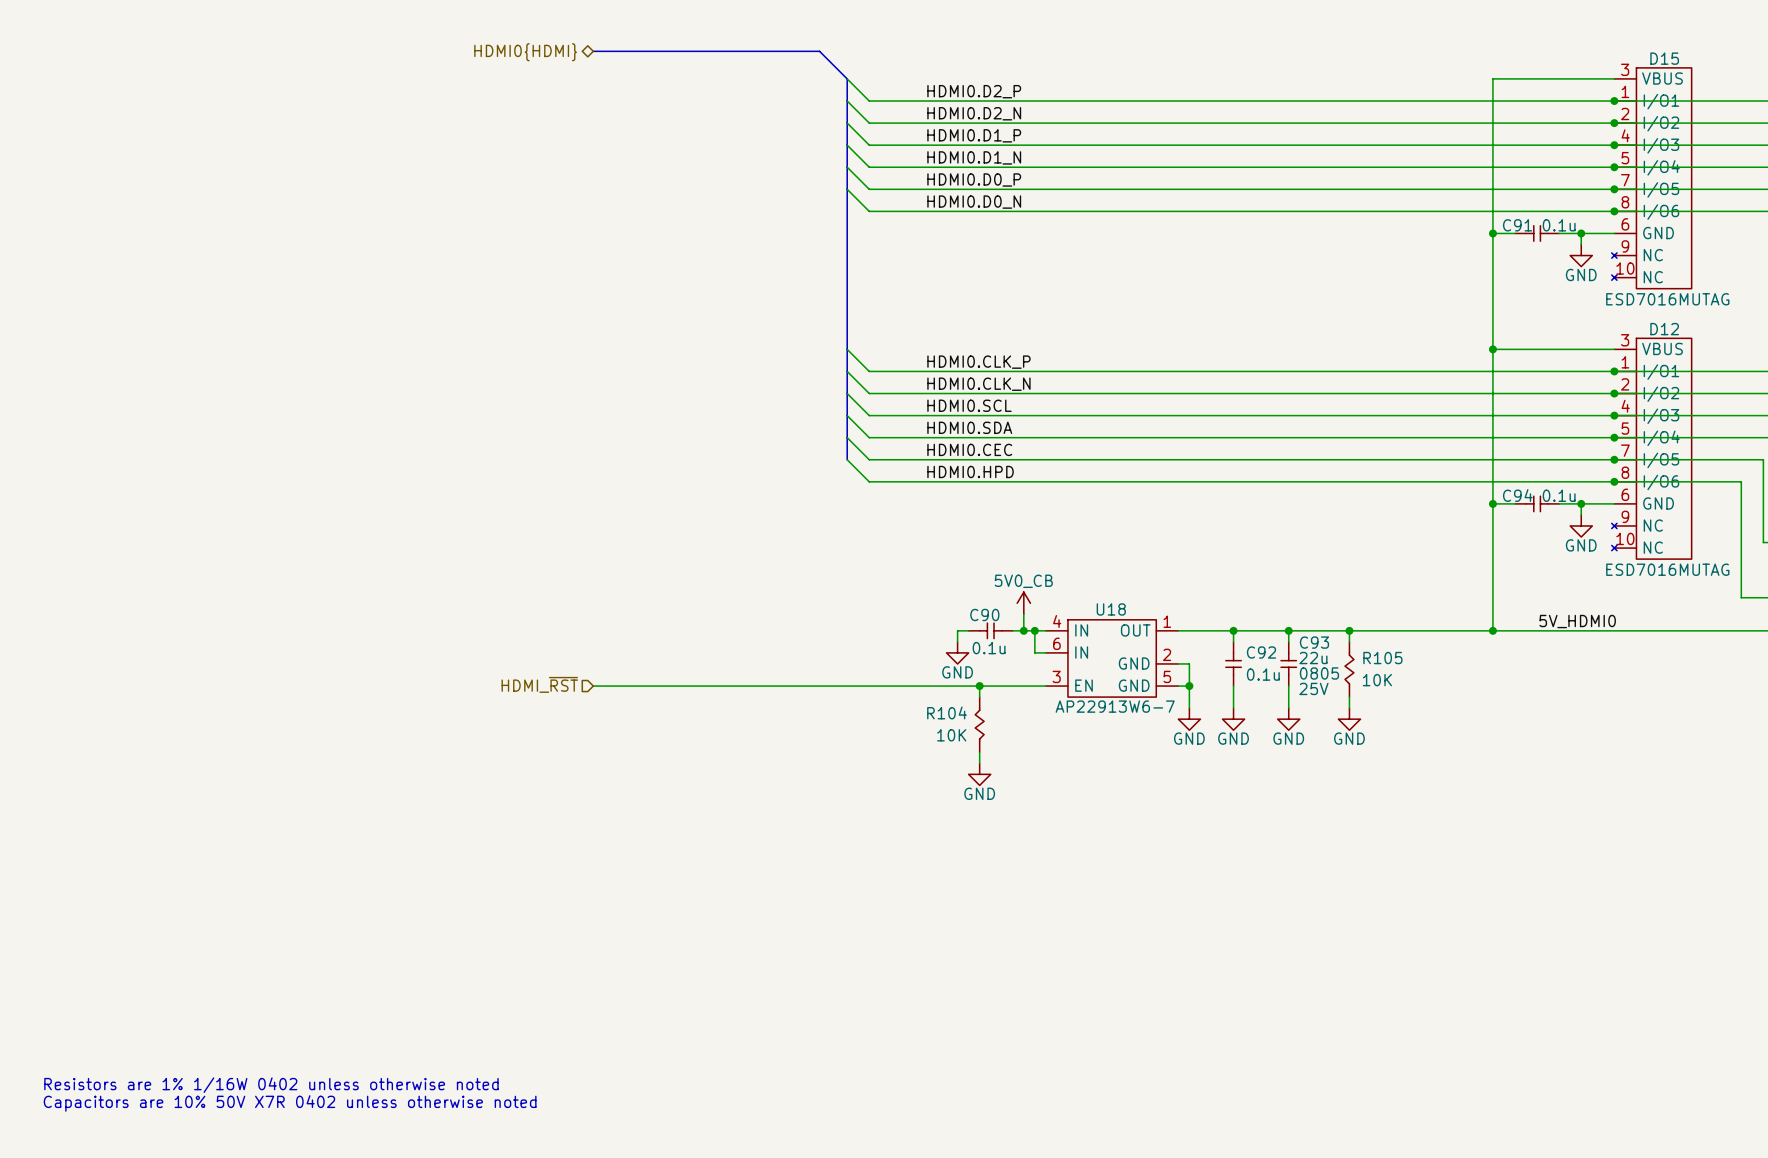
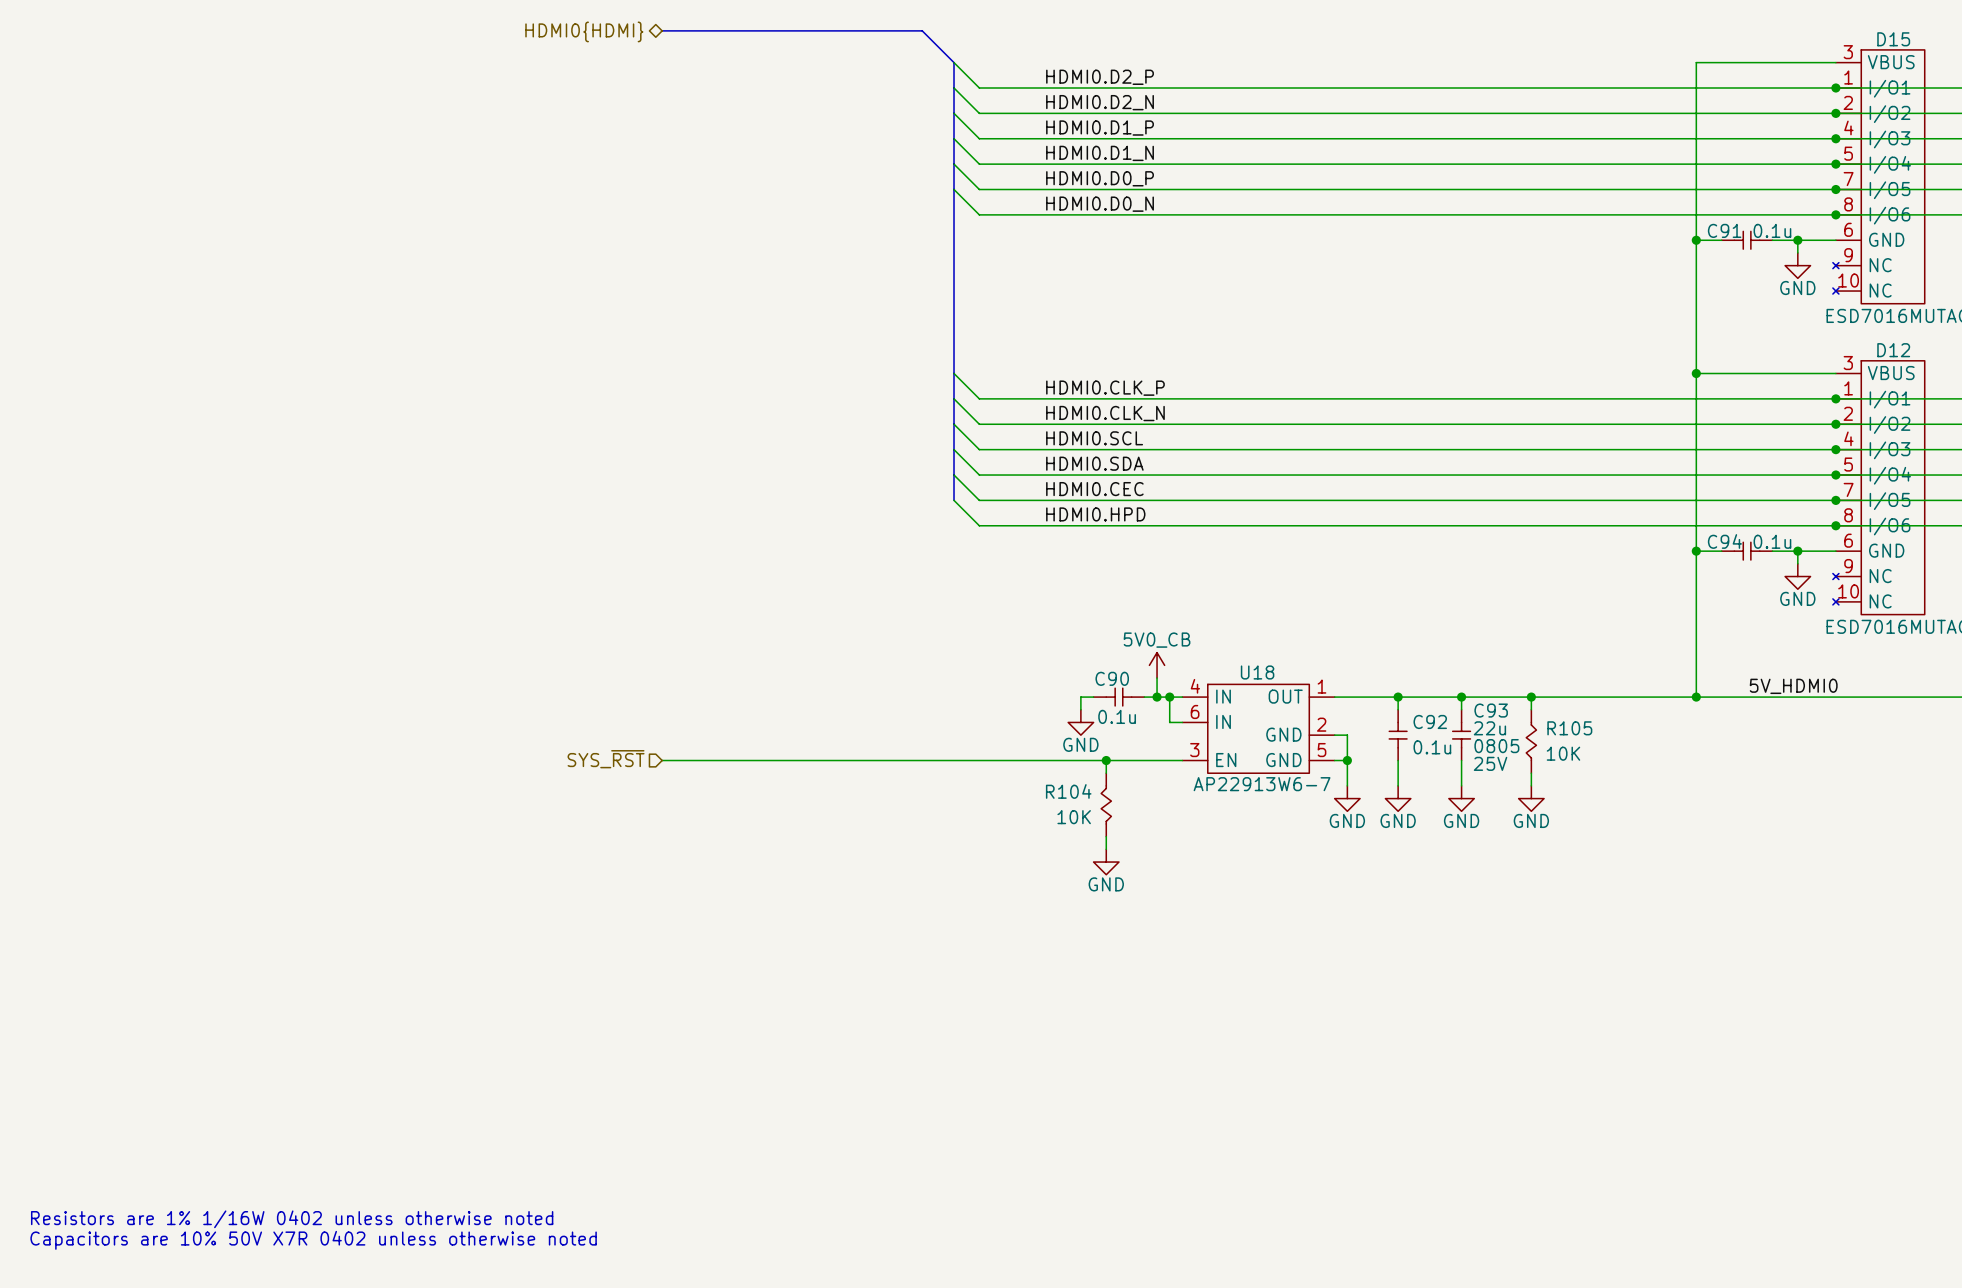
hierarchical label: HDMI_~{RST} (539, 684) -> SYS_~{RST} (606, 759)

